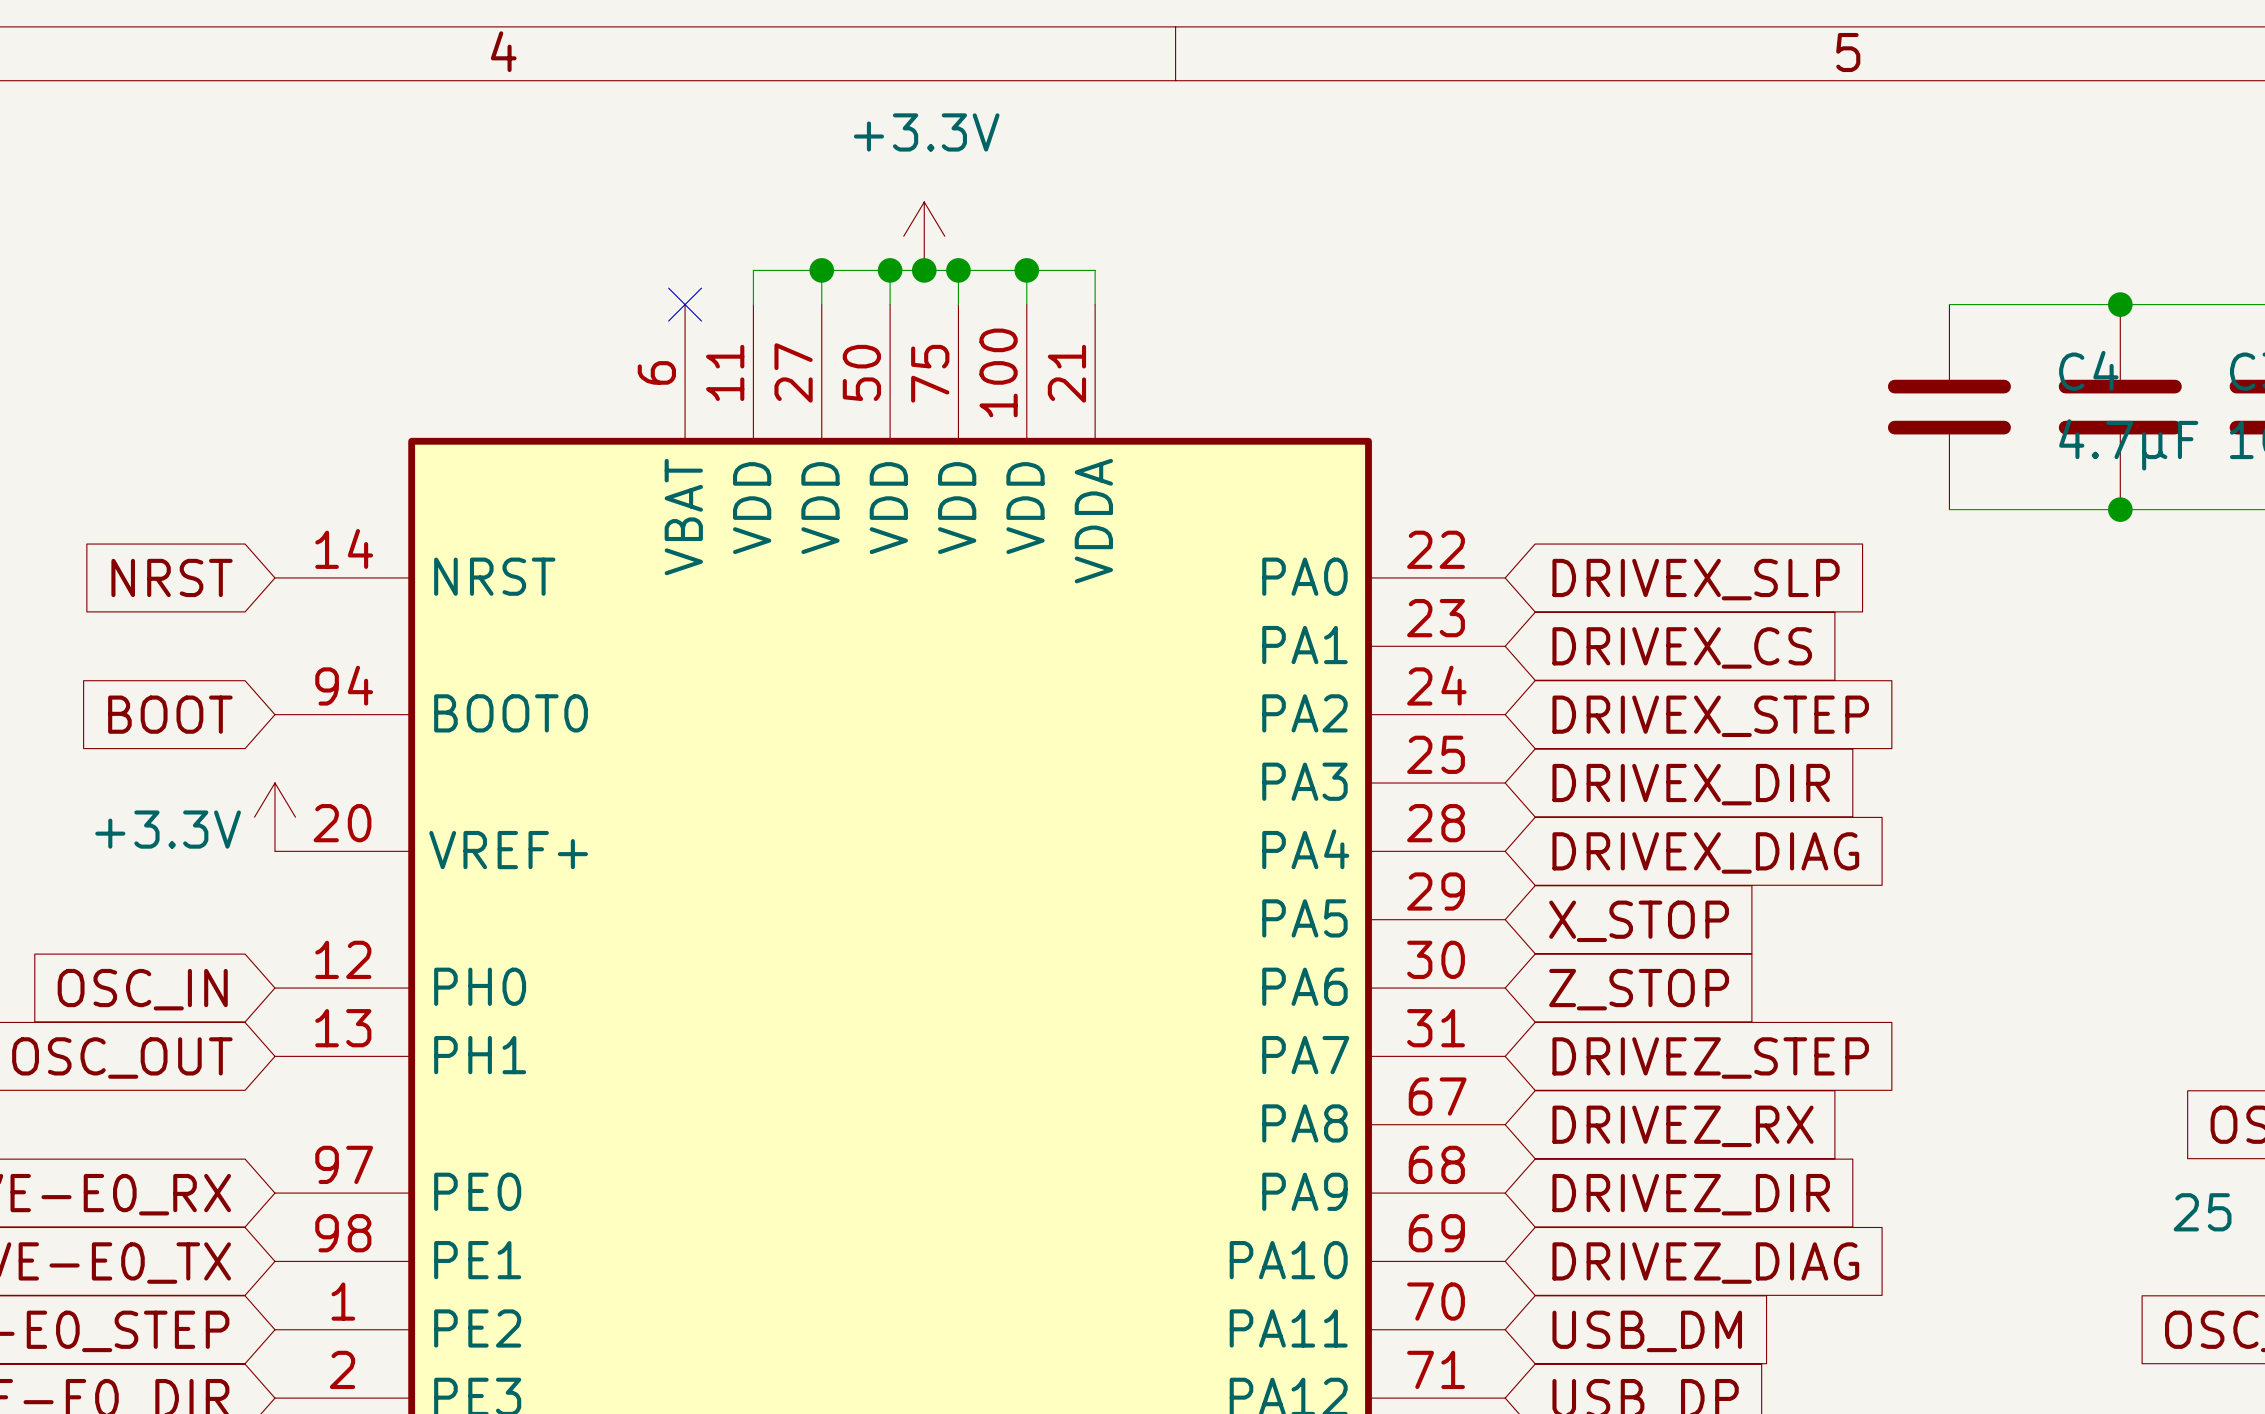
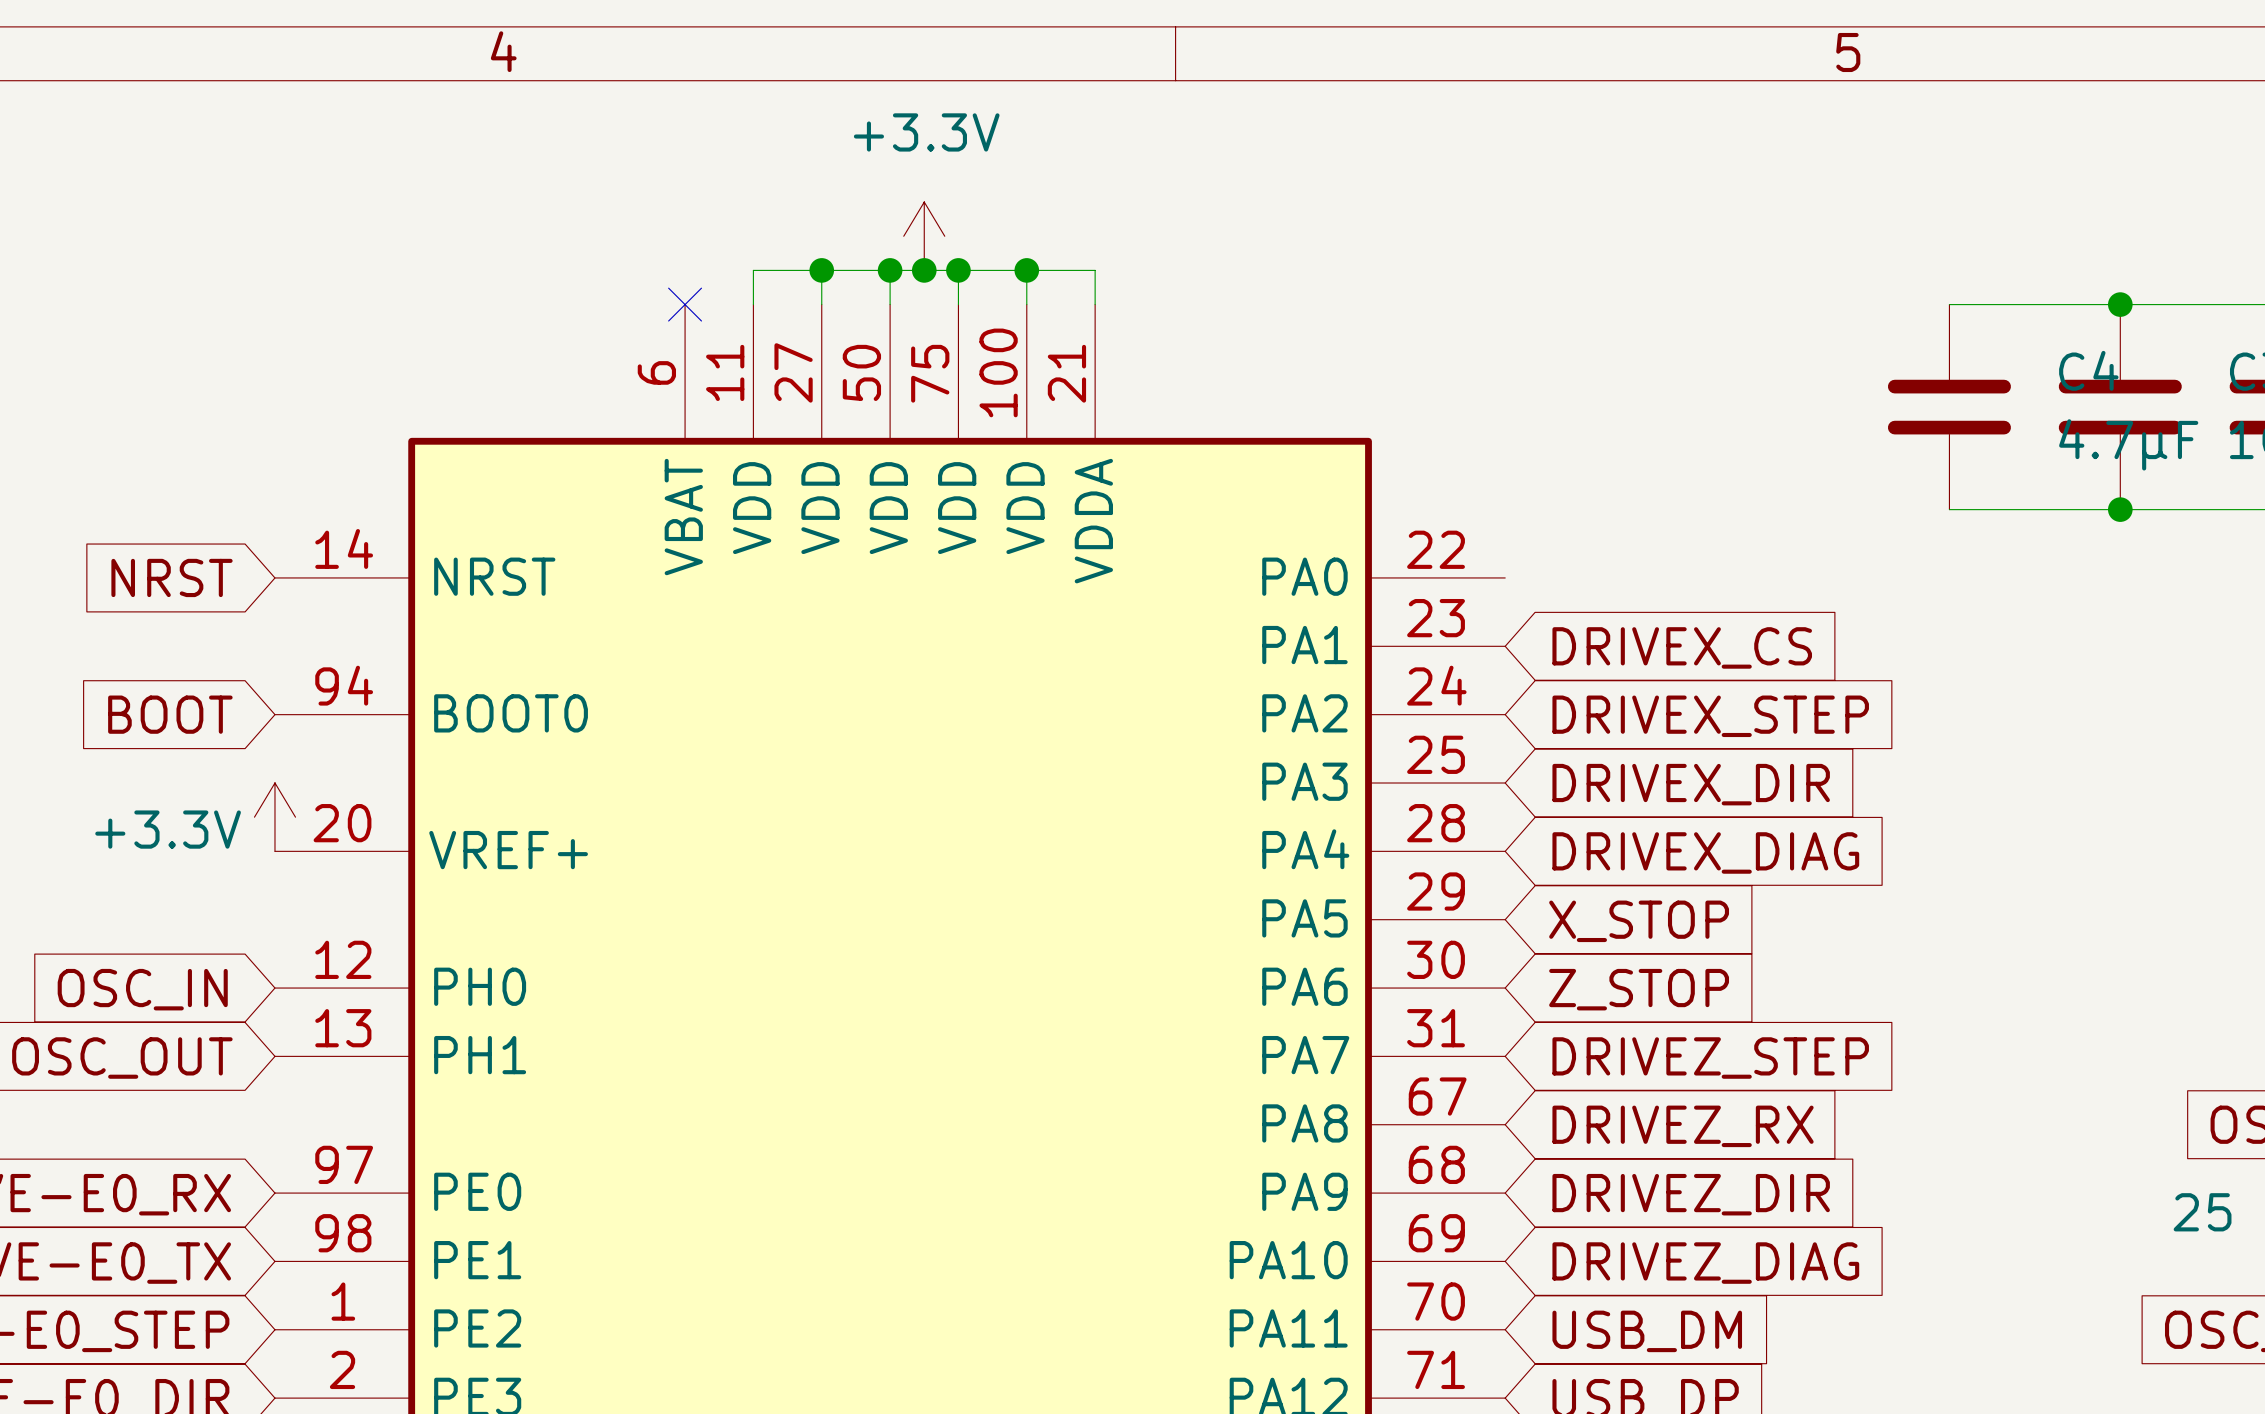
global label: DRIVEX_SLP (1696, 579) -> none

